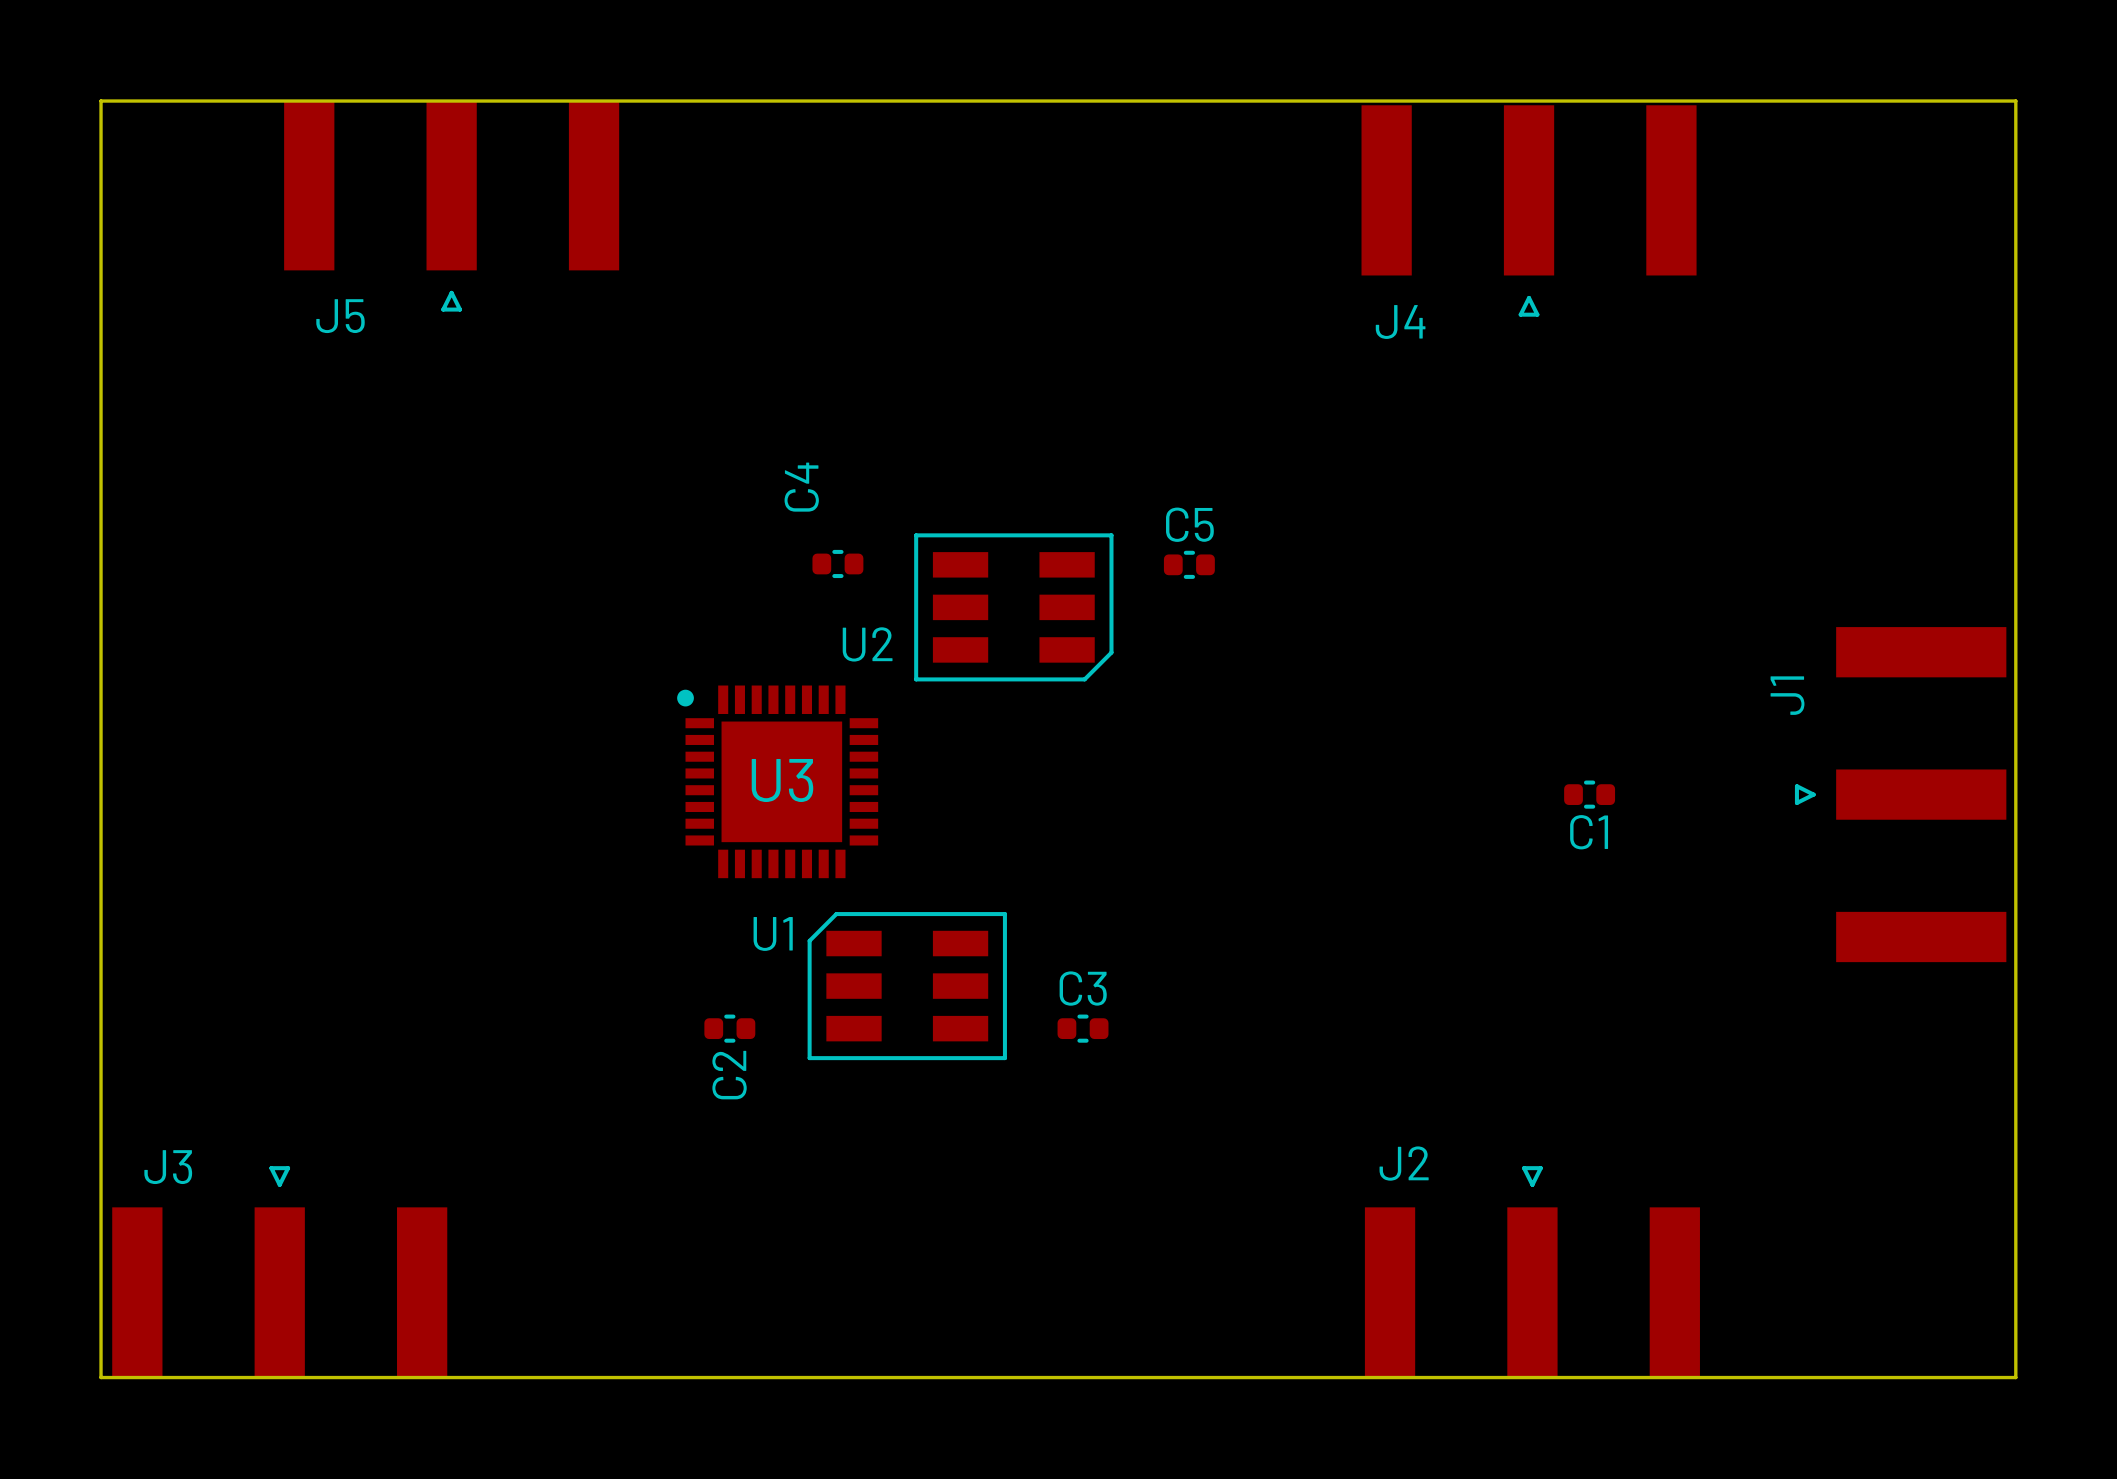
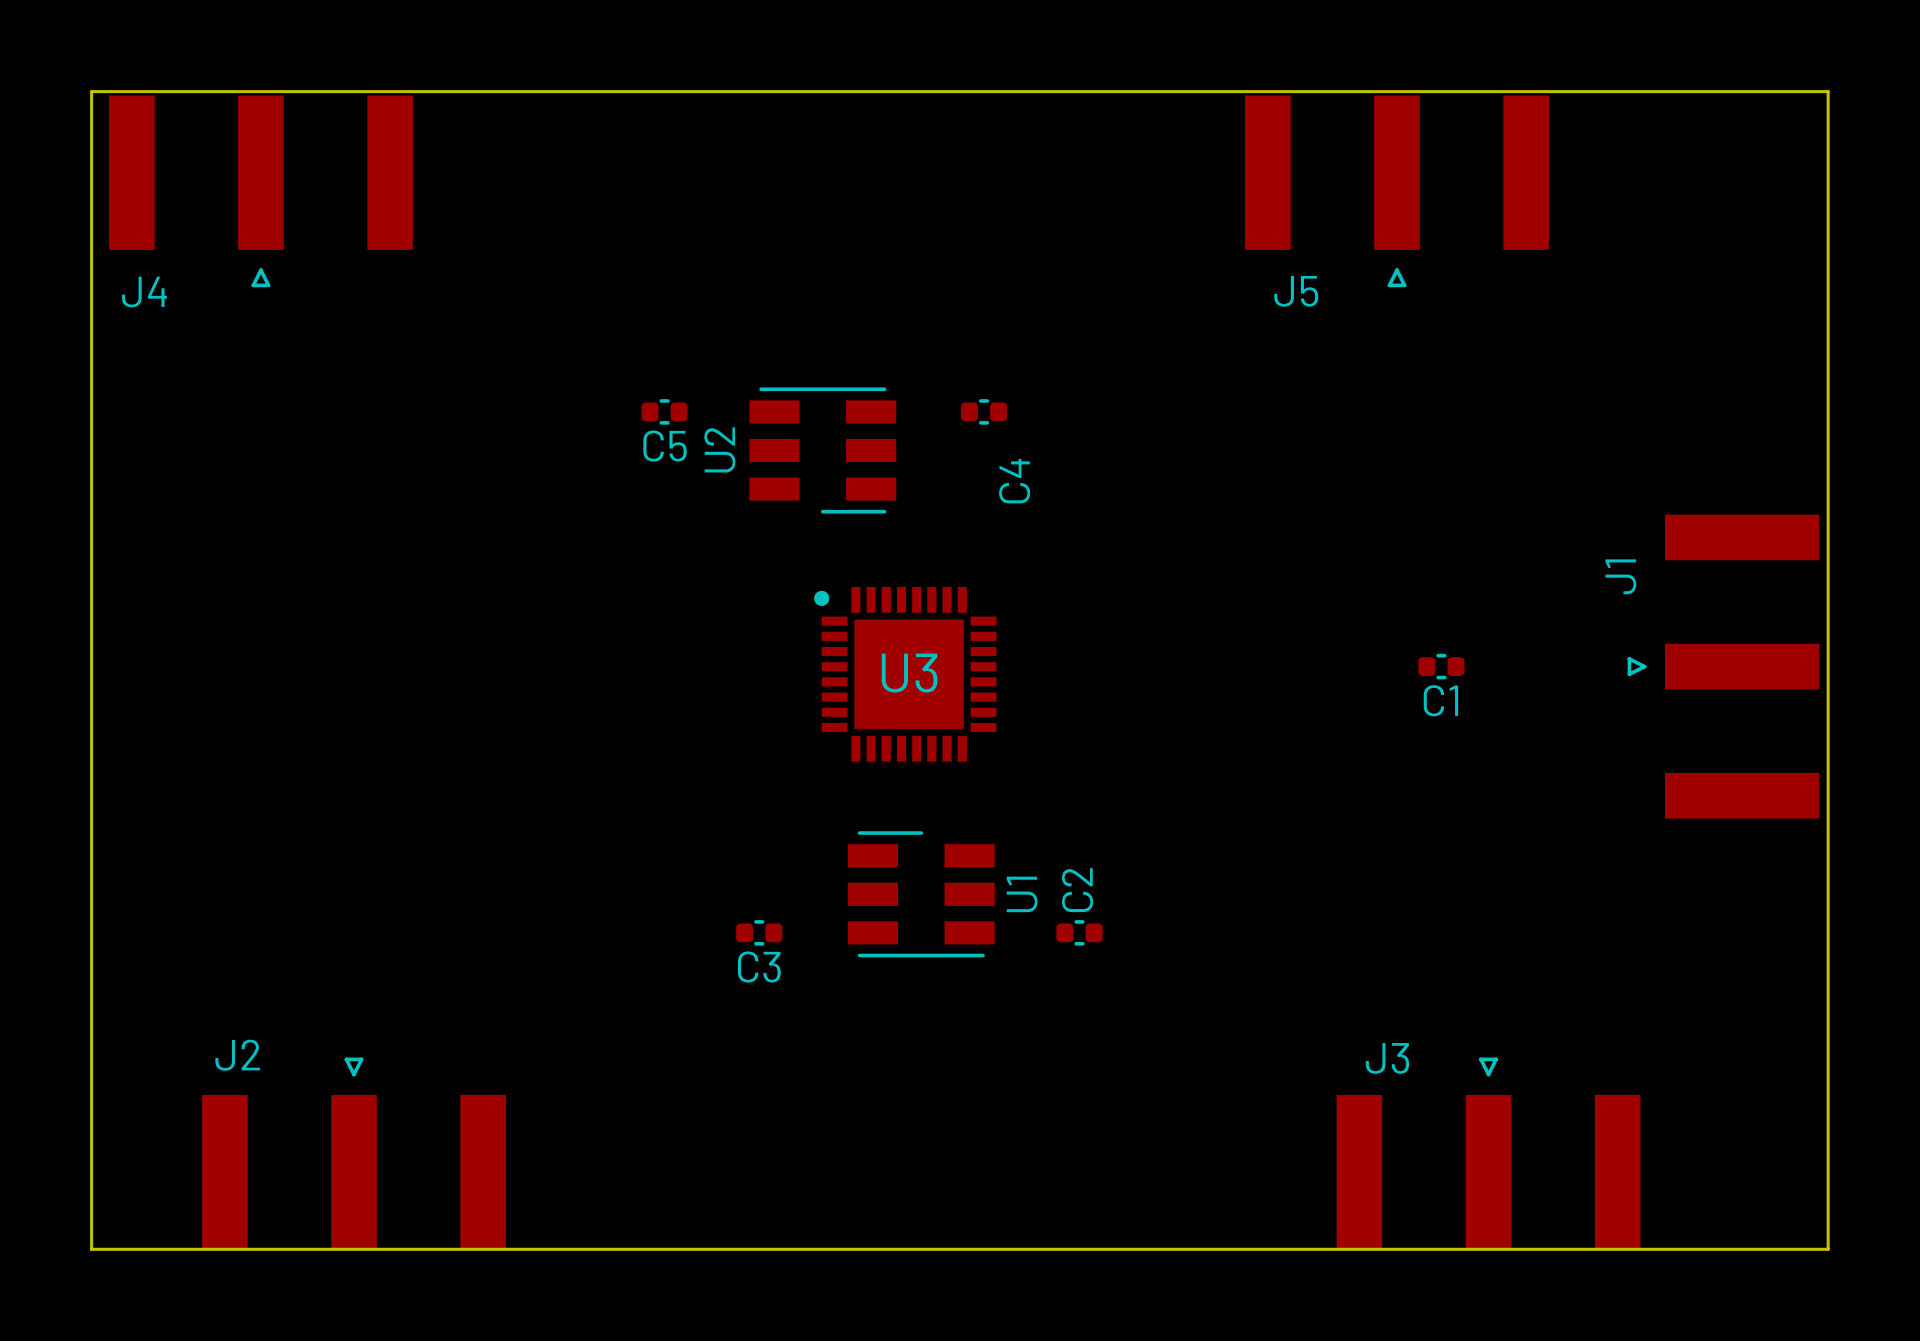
J5 position: (451, 205) -> (1397, 191)
J4 position: (1529, 210) -> (260, 191)
C4 name position: C4 (801, 487) -> C4 (1014, 481)
C5 name position: C5 (1189, 524) -> C5 (665, 446)
U2 footprint: [914, 533, 1114, 682] -> [749, 387, 897, 514]
C4 position: (837, 563) -> (984, 411)
C5 position: (1189, 564) -> (664, 411)
U3 position: (777, 781) -> (905, 674)
C1 position: (1589, 794) -> (1441, 666)
J1 position: (1900, 794) -> (1723, 666)
U1 footprint: [807, 912, 1007, 1061] -> [847, 831, 995, 958]
U1 name position: U1 (773, 933) -> U1 (1022, 894)
C3 name position: C3 (1083, 988) -> C3 (759, 966)
C2 position: (729, 1028) -> (1079, 932)
C3 position: (1083, 1028) -> (759, 932)
C2 name position: C2 (729, 1075) -> C2 (1077, 890)
J3 position: (279, 1271) -> (1488, 1153)
J2 position: (1532, 1271) -> (354, 1153)

